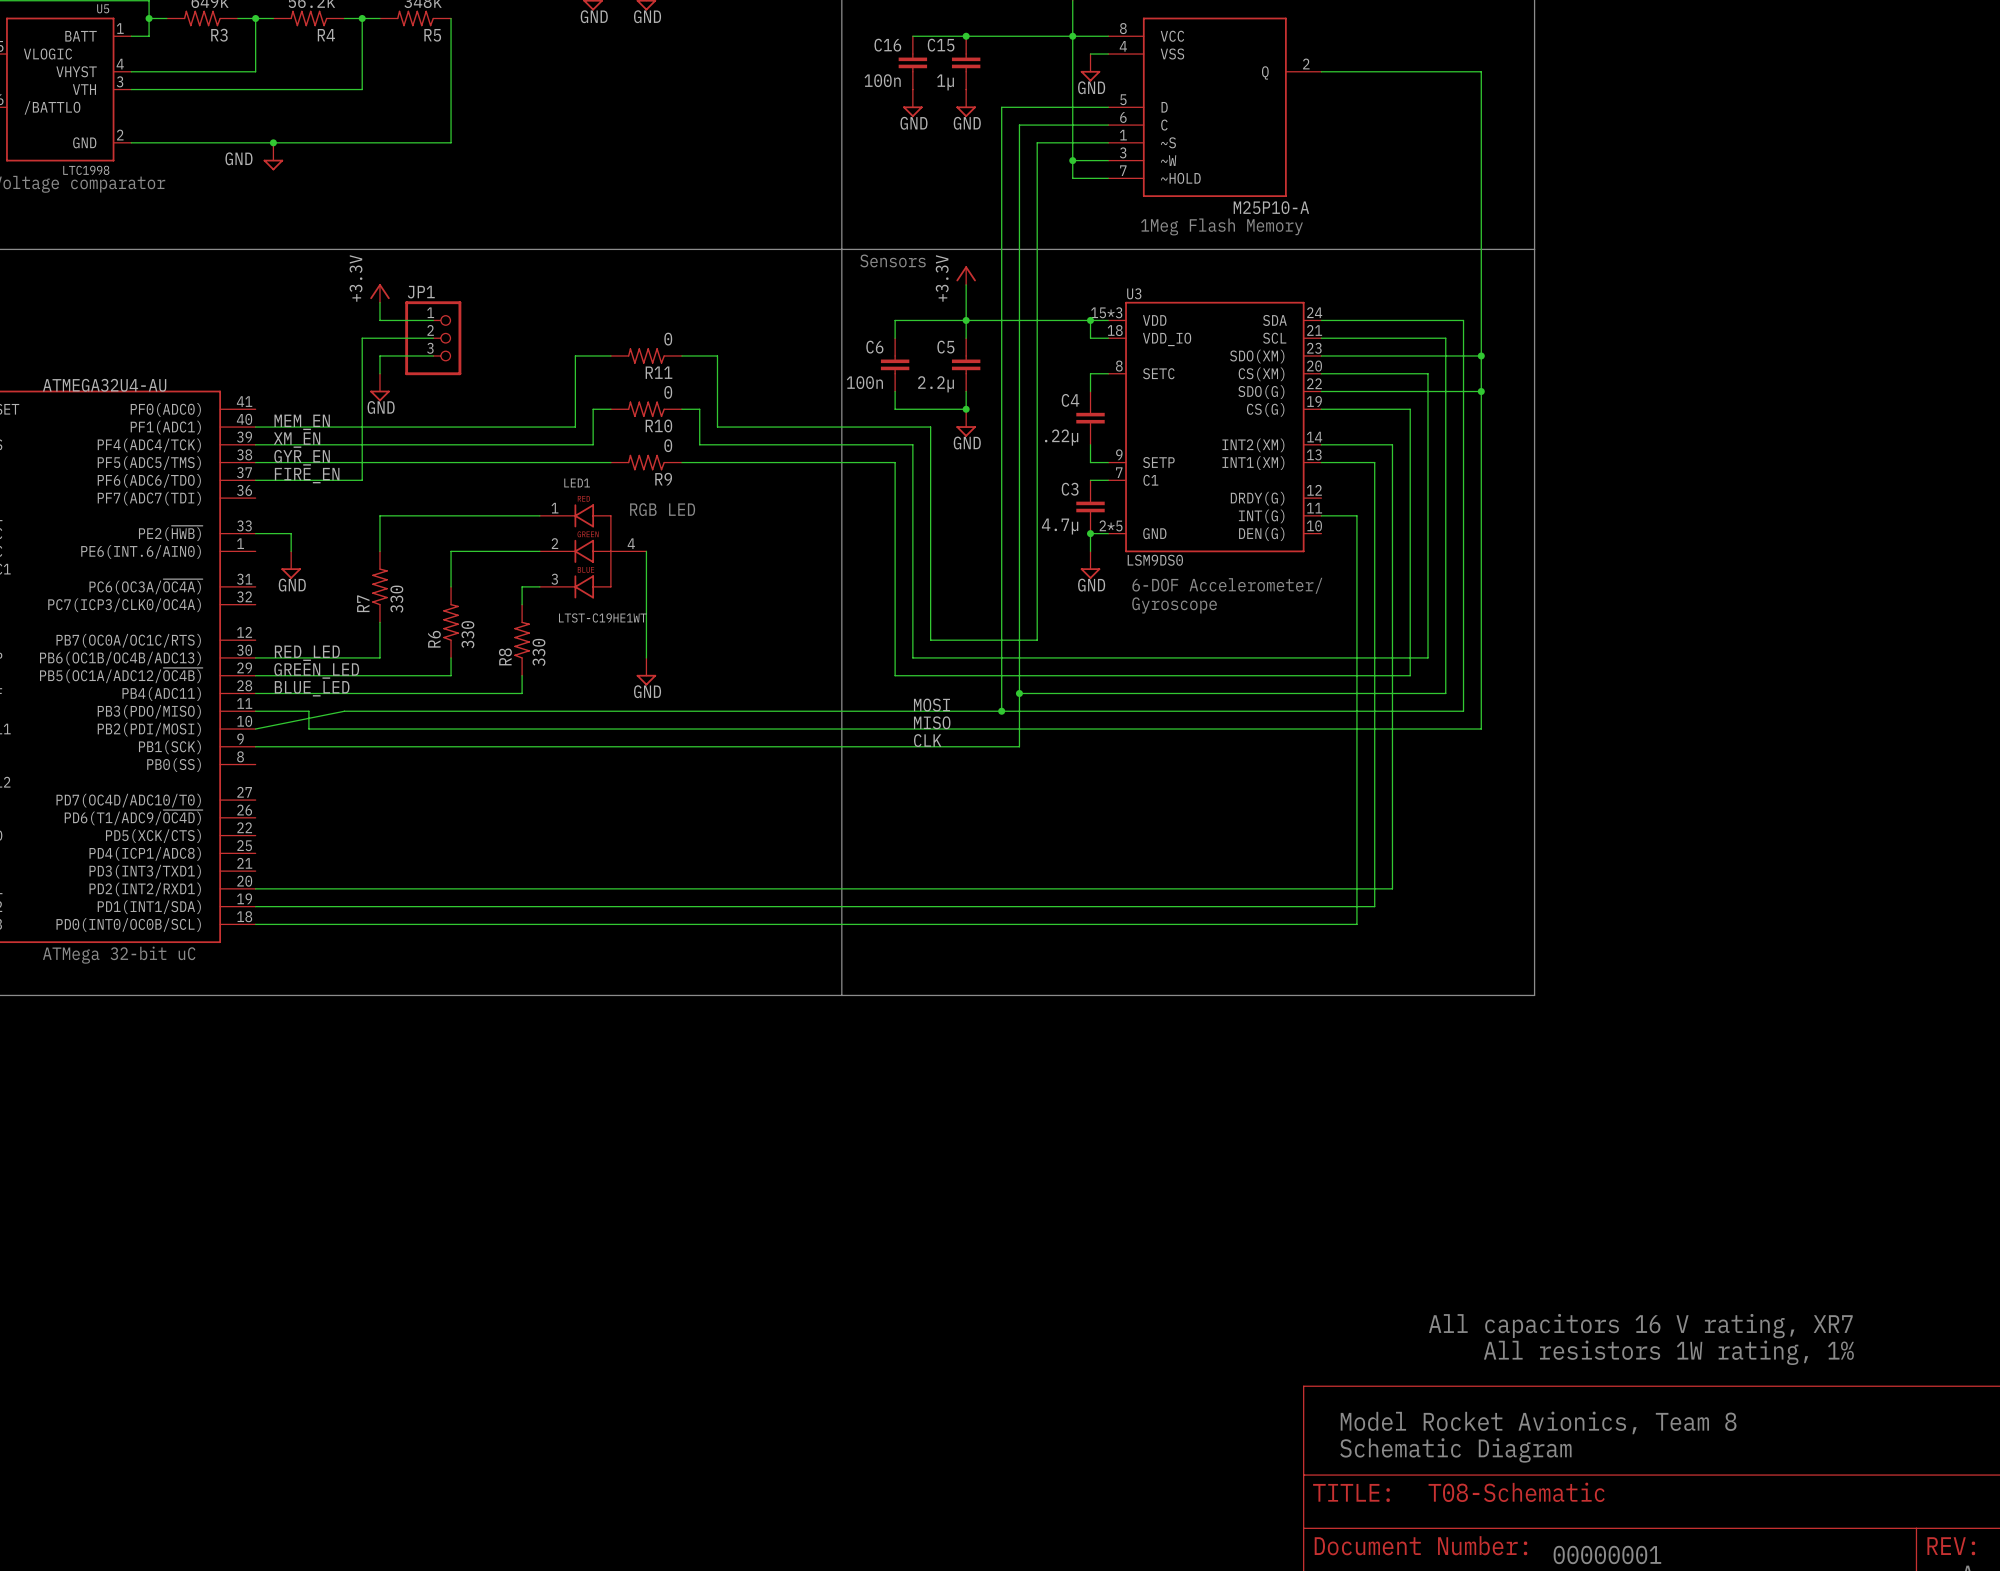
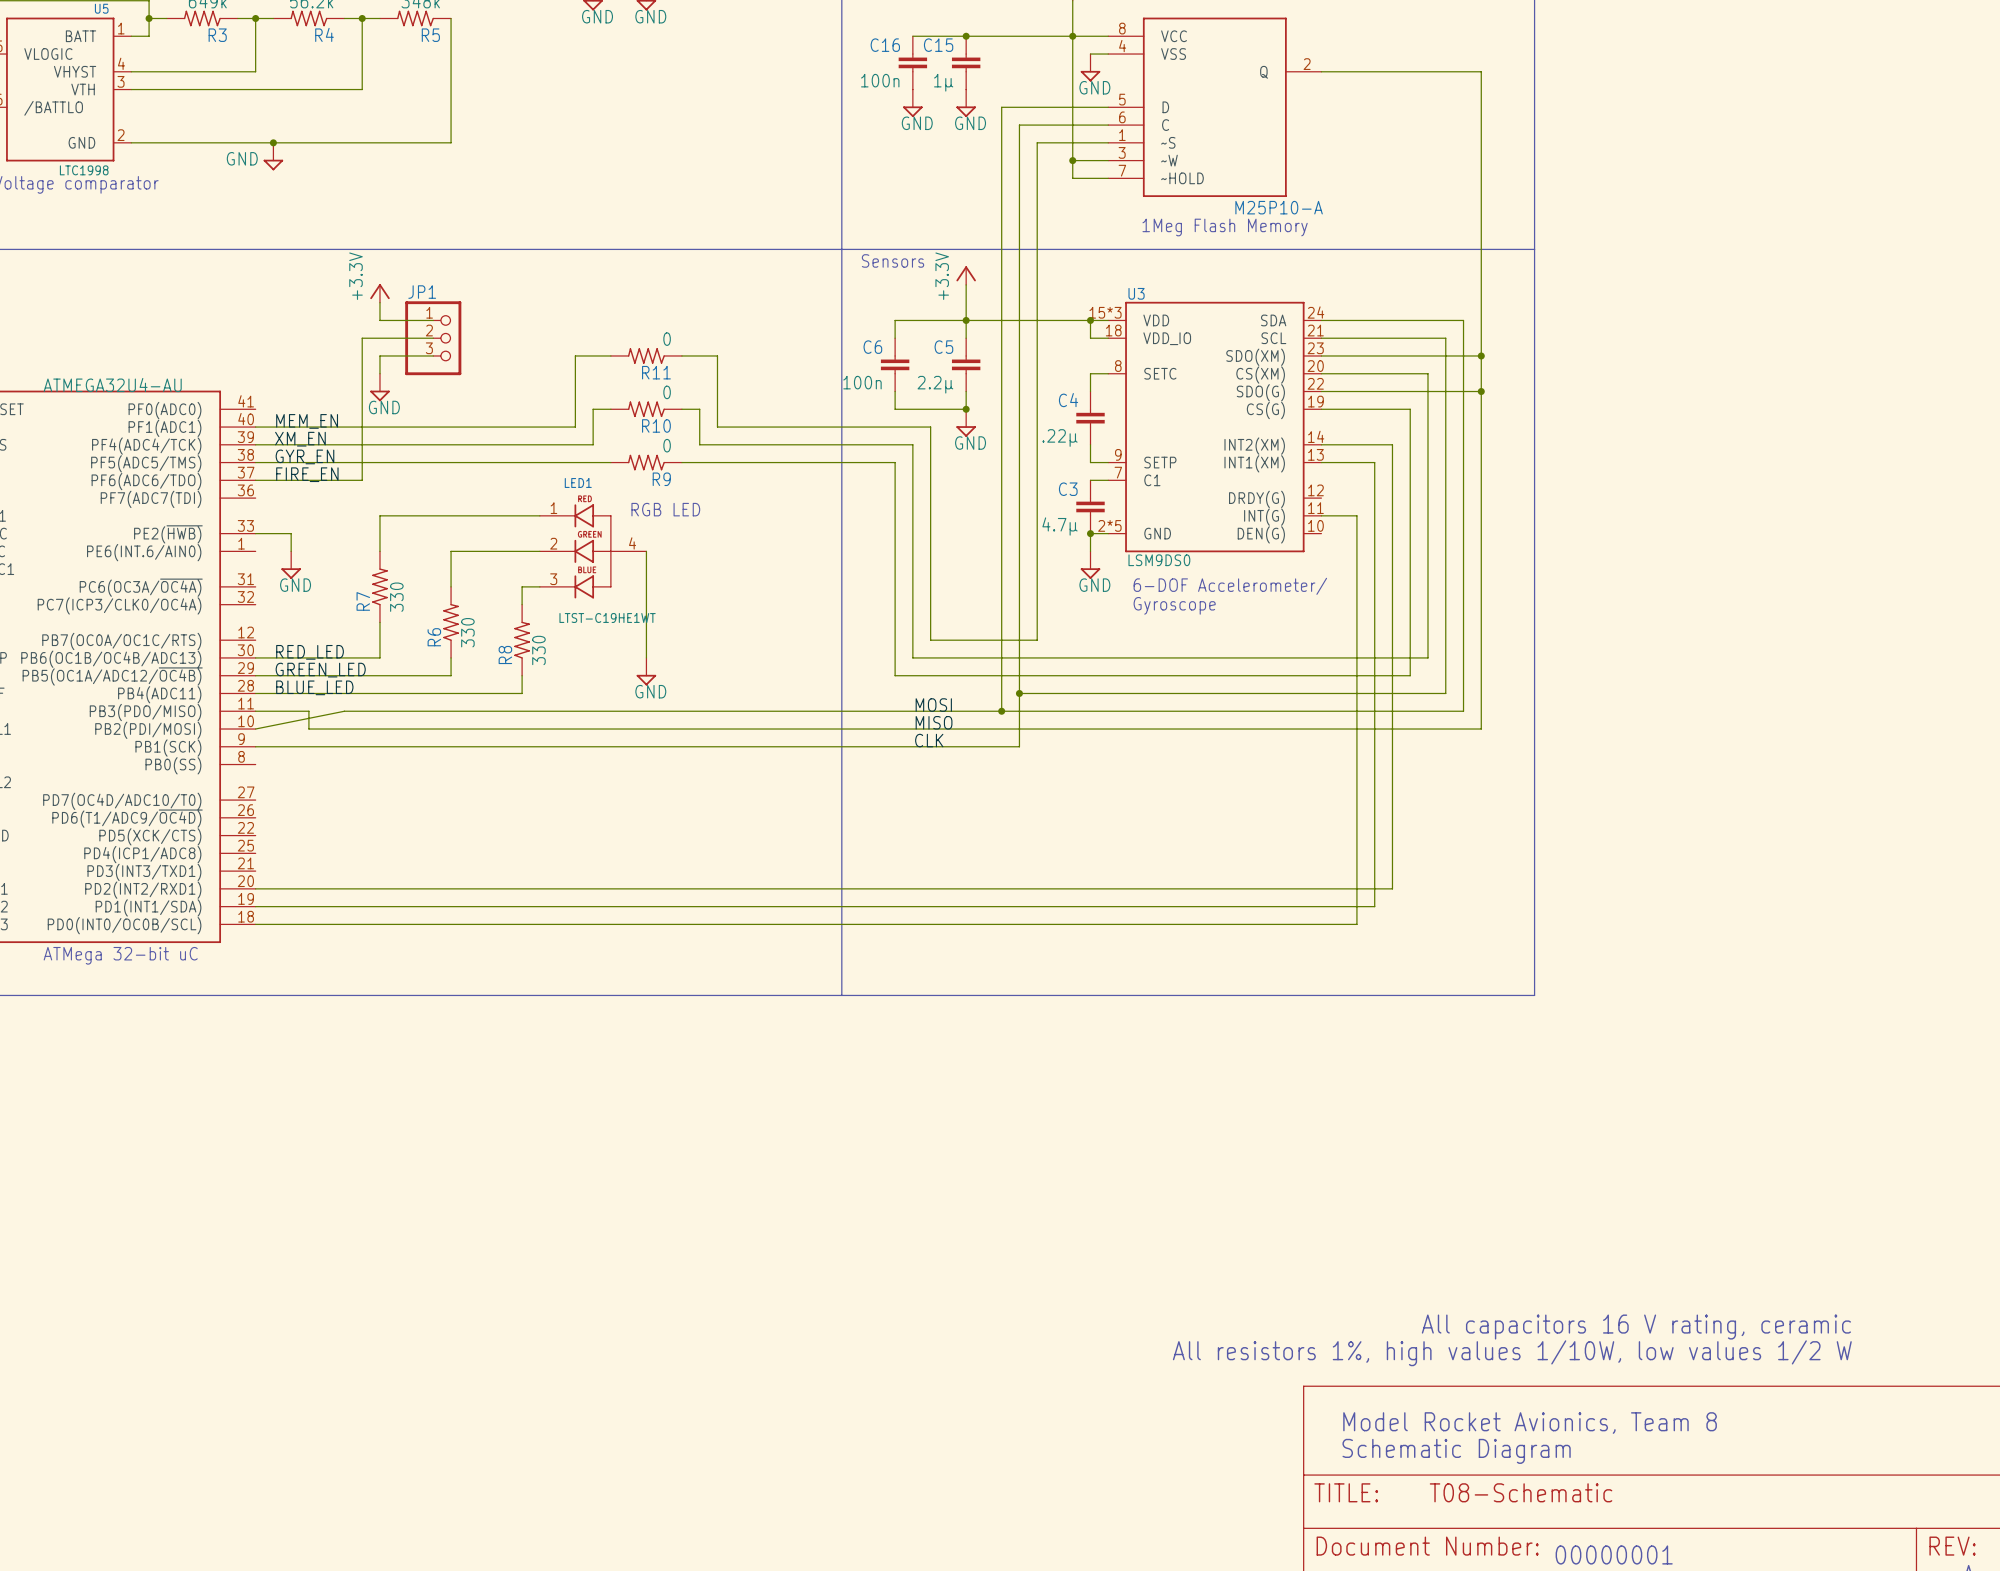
text: All capacitors 16 V rating, XR7 (1640, 1326) -> All capacitors 16 V rating, ceramic (1636, 1327)
text: All resistors 1W rating, 1% (1668, 1352) -> All resistors 1%, high values 1/10W, low values 1/2 W (1512, 1353)

